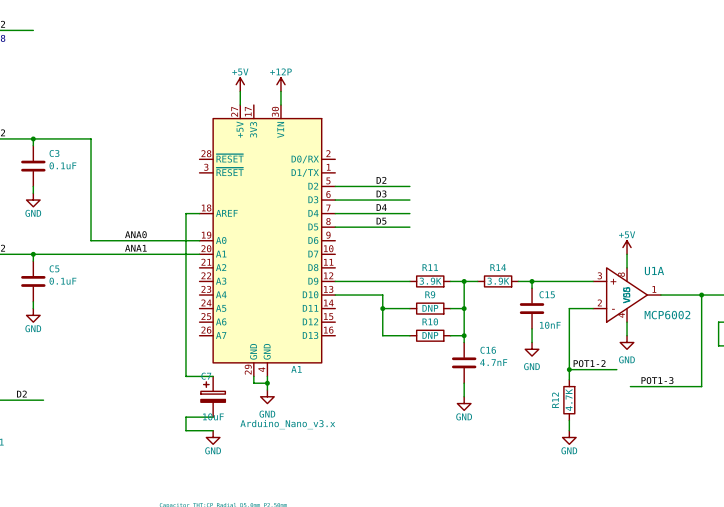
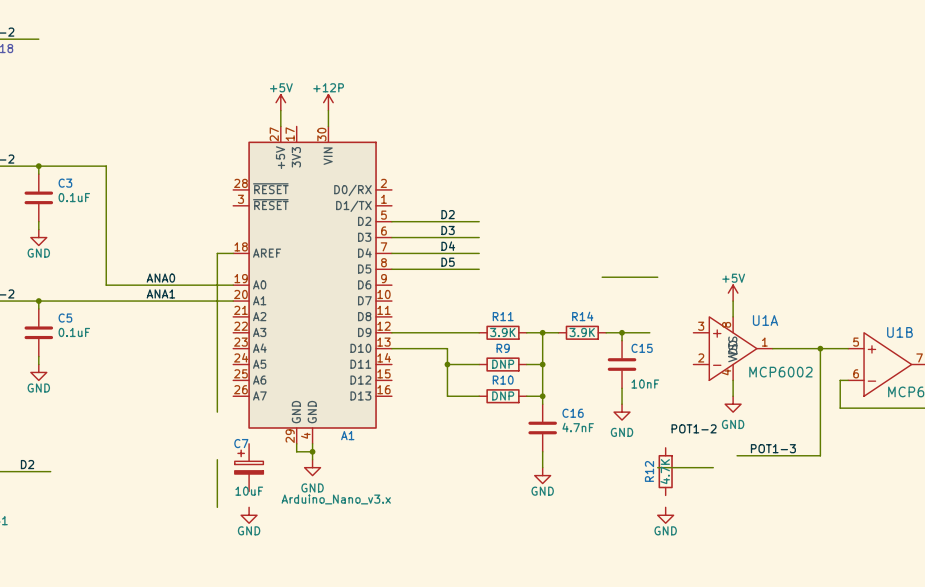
wire: none -> (602, 277) (657, 277)
wire: (555, 281) (593, 281) -> none
wire: (593, 308) (569, 308) (569, 379) -> none
wire: (185, 349) (185, 376) (213, 376) -> none
wire: (569, 369) (616, 369) -> (657, 467) (713, 467)
junction: (569, 369) -> none
wire: (185, 417) (213, 417) -> (217, 491) (217, 459)
wire: (569, 420) (569, 430) -> none
wire: (185, 430) (213, 430) -> none

